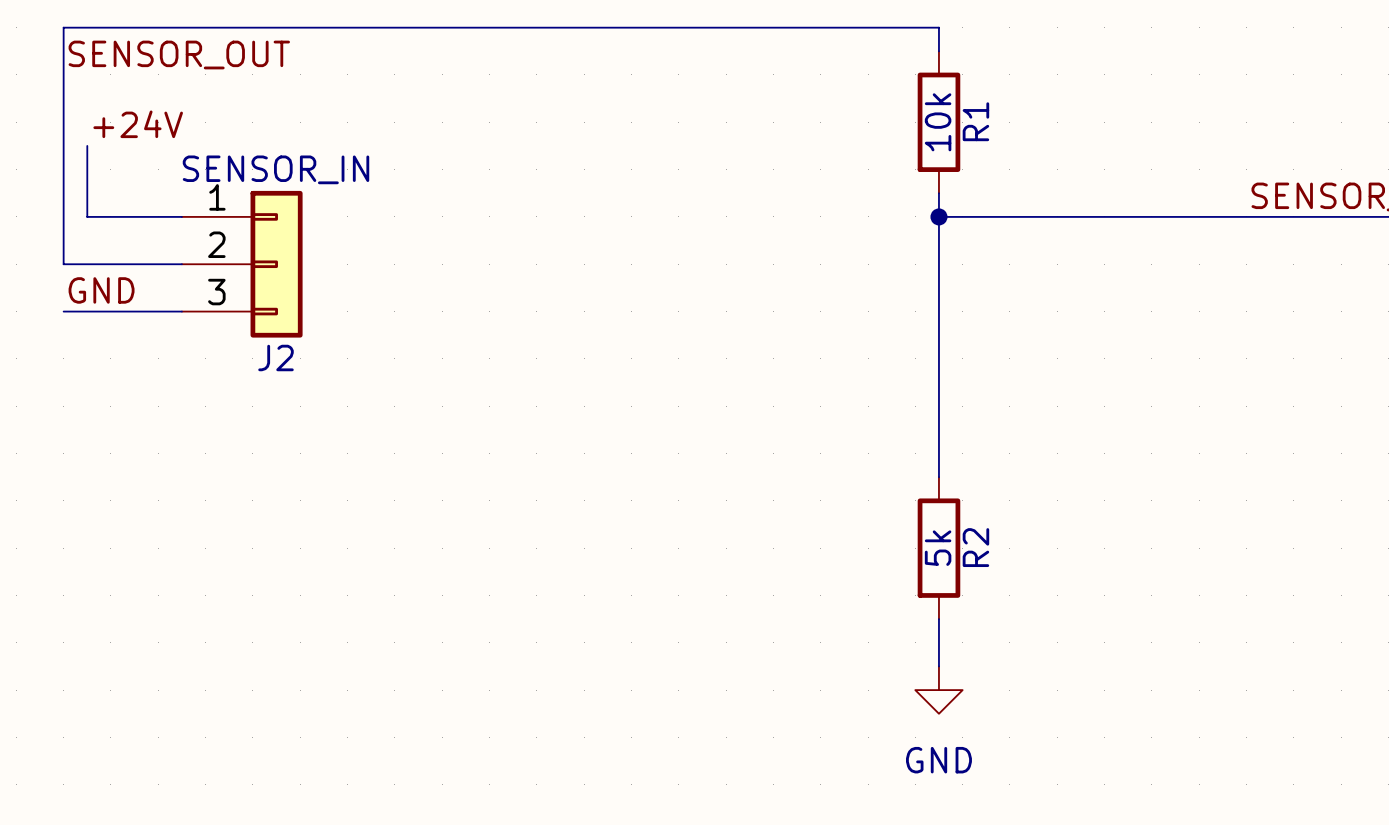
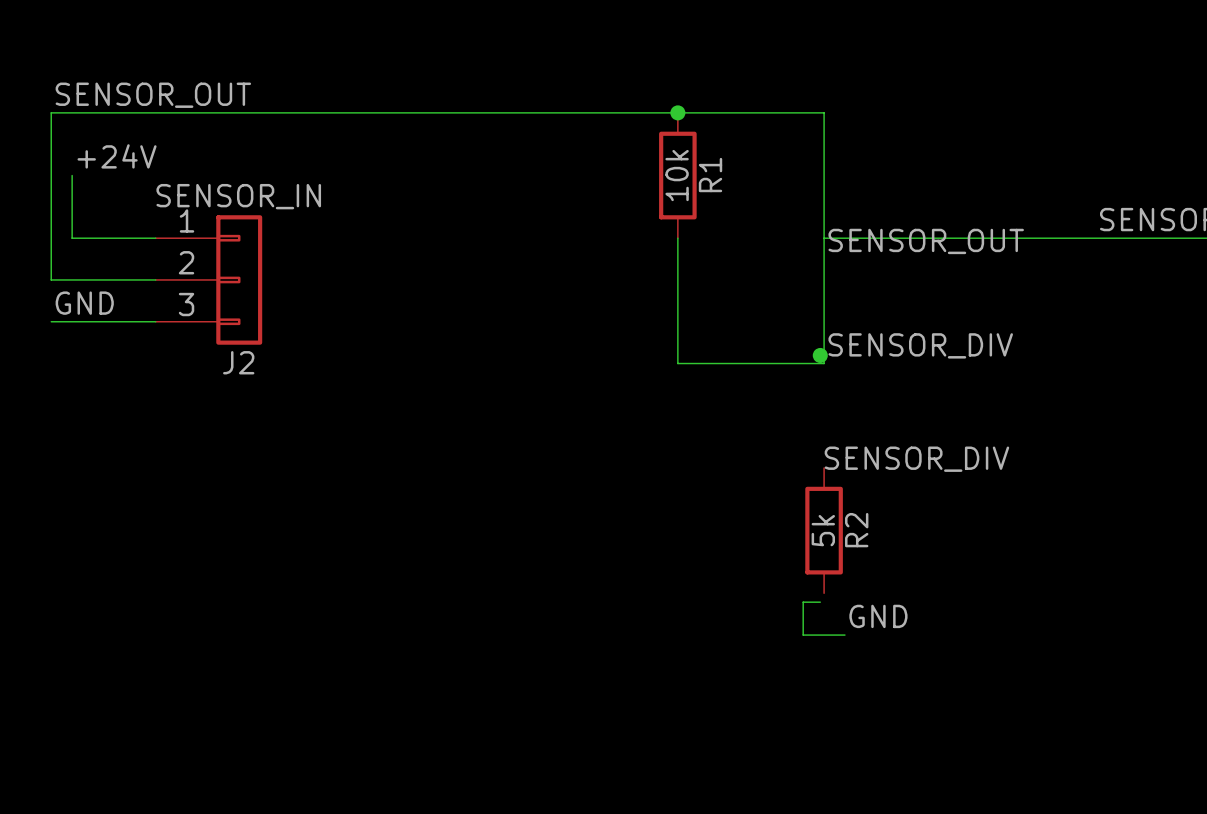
wire: (938, 51) (938, 27) (63, 27) (63, 74) -> (824, 217) (824, 112) (51, 112)
junction: none -> (677, 112)
R1 position: (938, 122) -> (677, 175)
junction: (938, 216) -> none
label: none -> SENSOR_OUT (926, 241)
label: none -> SENSOR_DIV (920, 345)
junction: none -> (820, 355)
wire: (938, 358) (938, 477) -> (824, 363) (677, 363) (677, 238)
label: none -> SENSOR_DIV (916, 459)
wire: (938, 619) (938, 666) -> none
wire: none -> (820, 602) (803, 602) (803, 635) (844, 635)
label: none -> GND (878, 616)
power symbol: GND (938, 690) -> none

